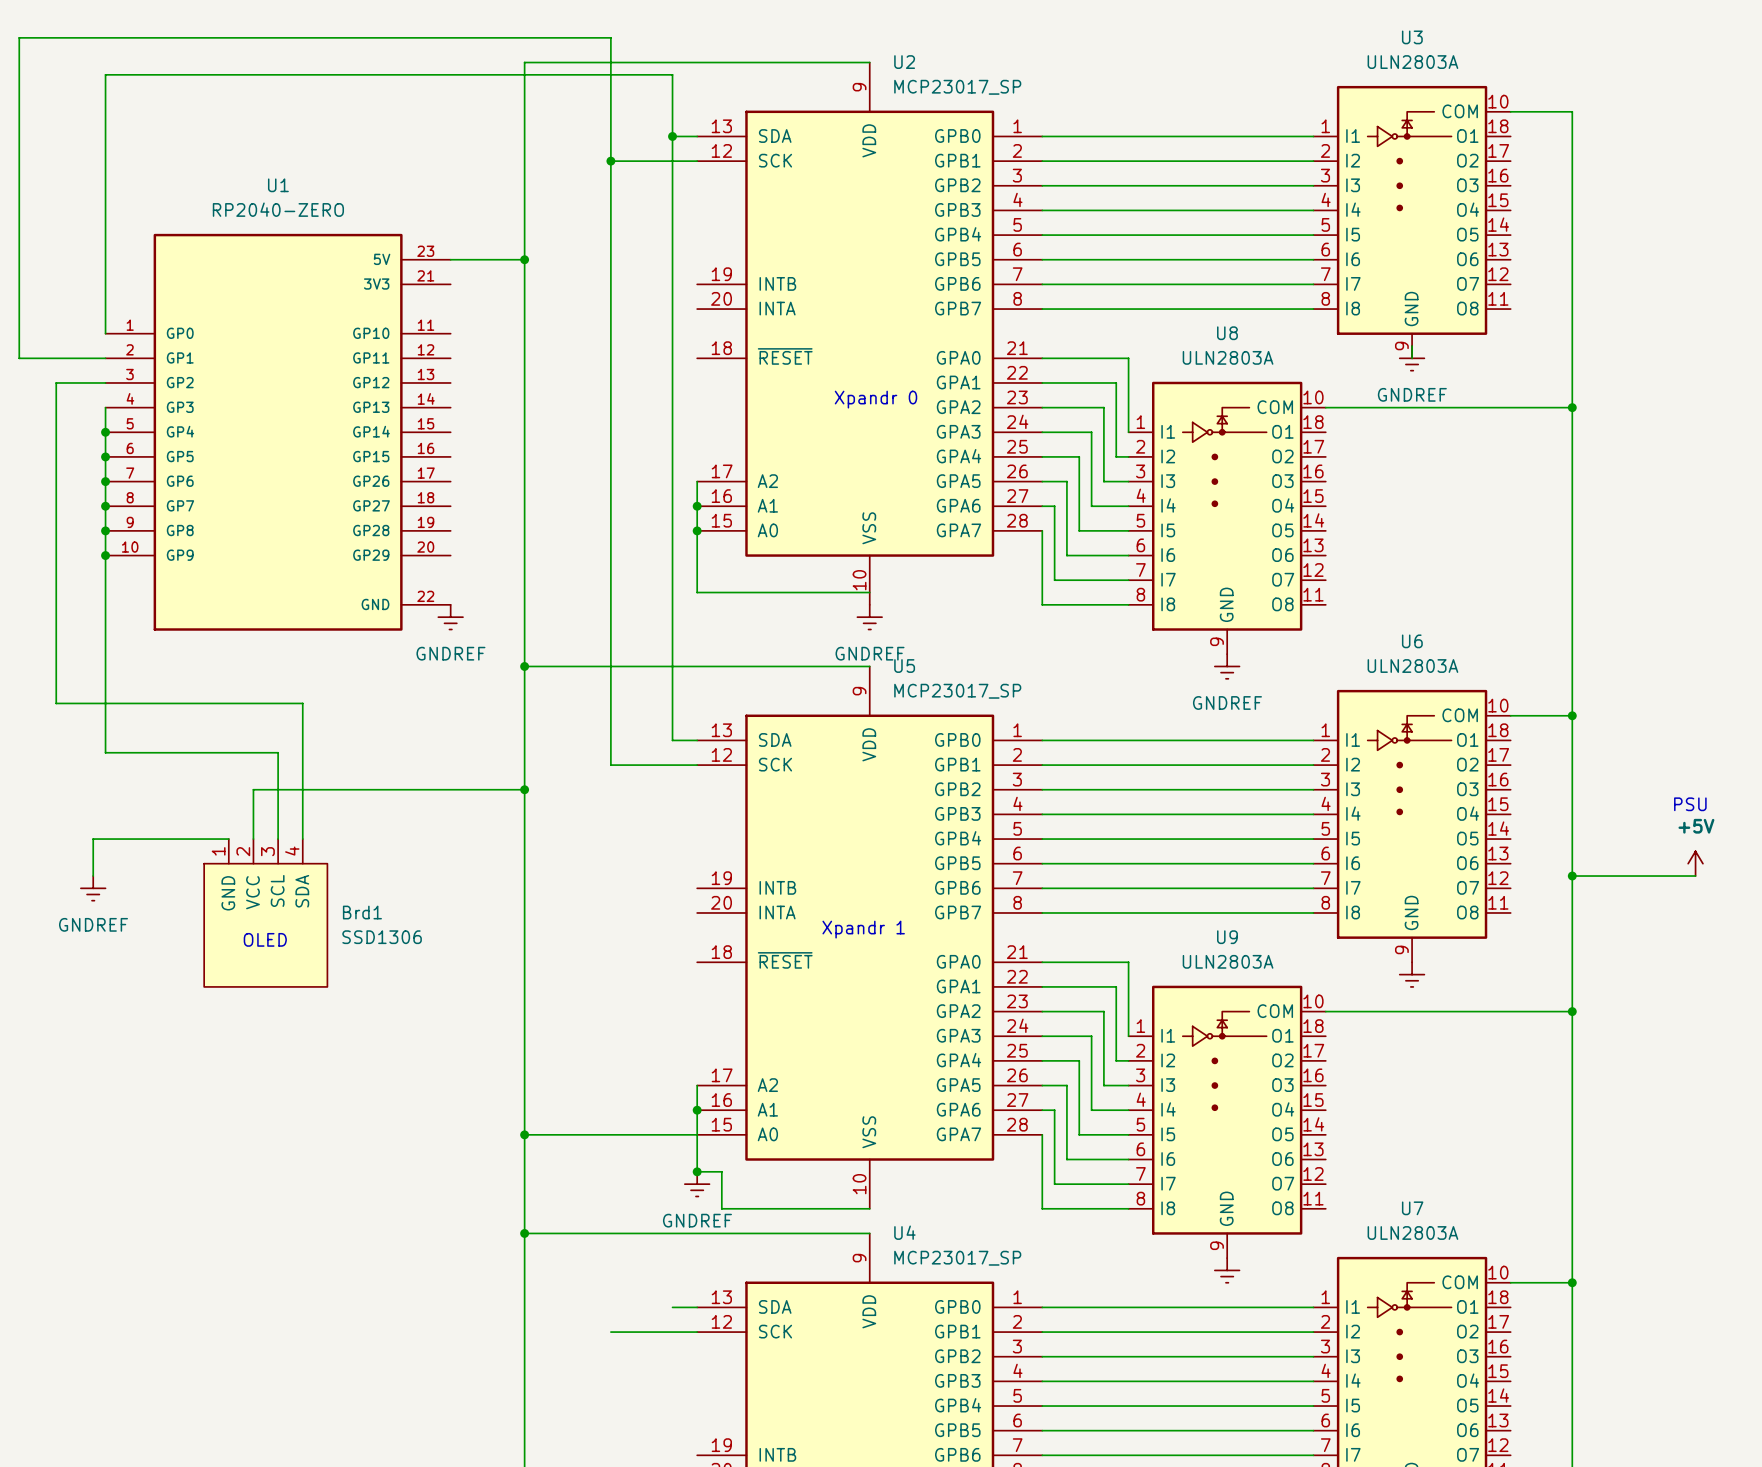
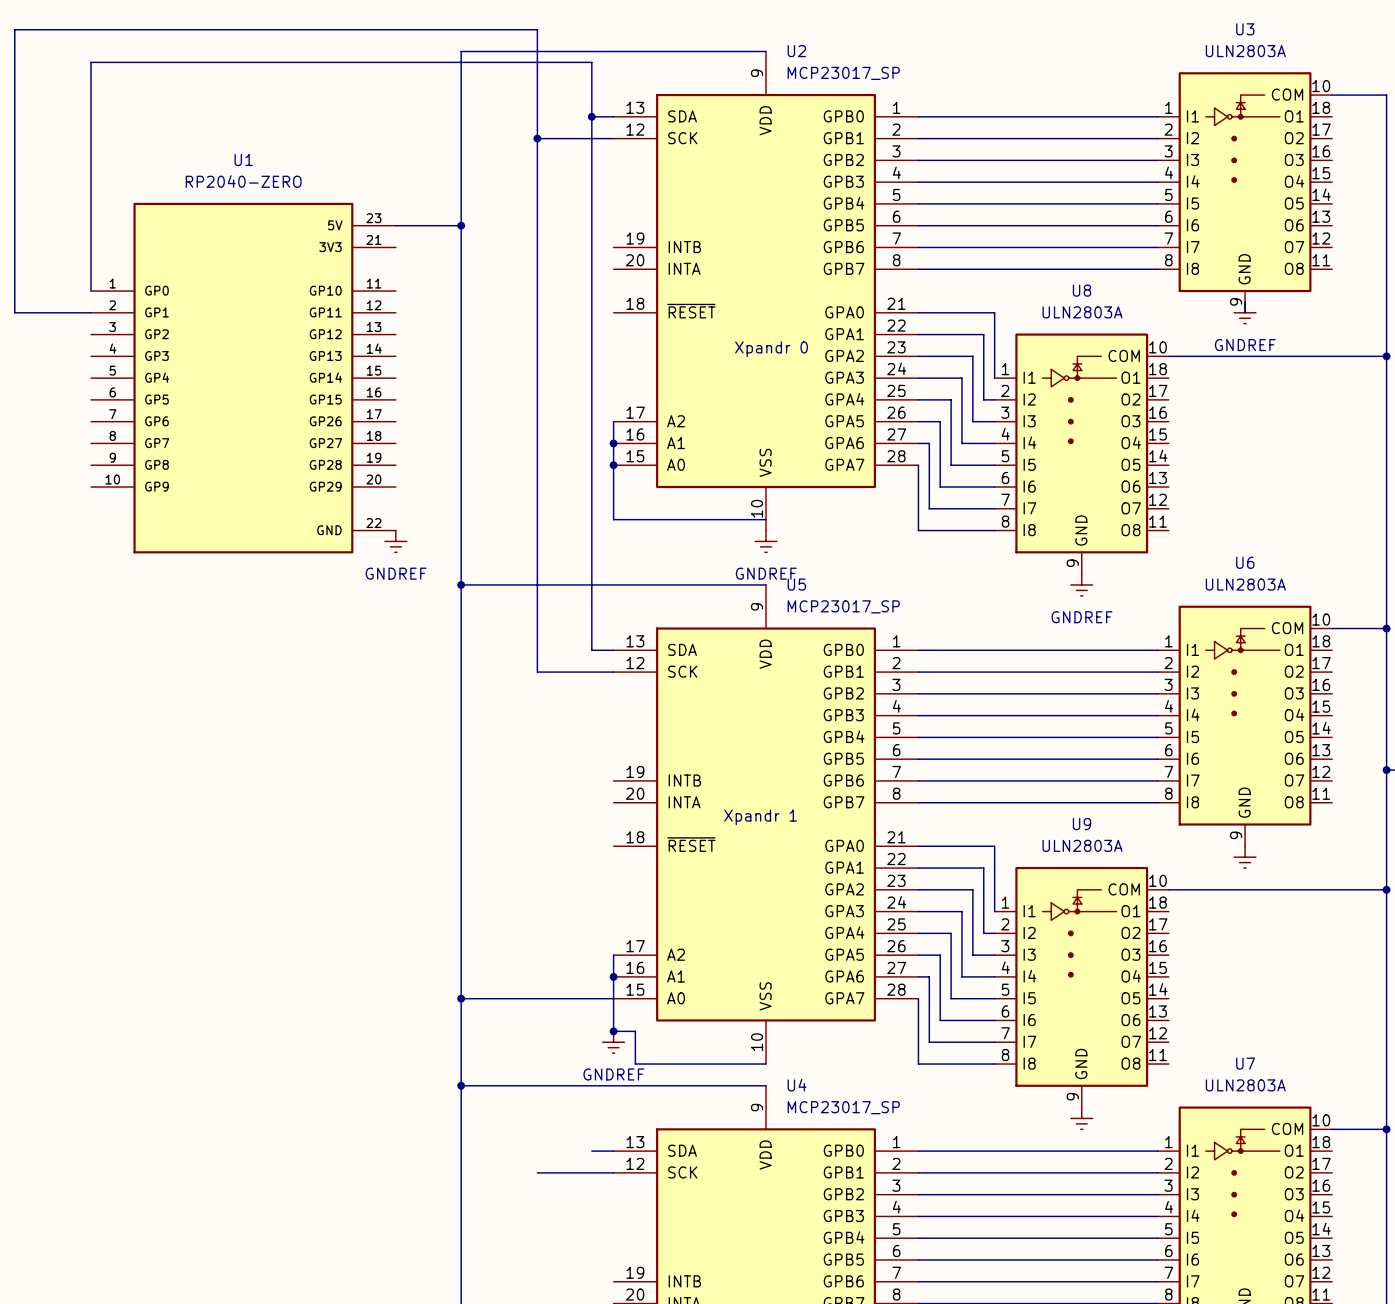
wire: (105, 382) (56, 382) (56, 703) (302, 703) (302, 839) -> none
wire: (105, 407) (105, 752) (278, 752) (278, 839) -> none
junction: (105, 432) -> none
junction: (105, 456) -> none
junction: (105, 481) -> none
junction: (105, 506) -> none
junction: (105, 530) -> none
junction: (105, 555) -> none
wire: (524, 789) (253, 789) (253, 839) -> none
junction: (524, 789) -> none
wire: (228, 839) (93, 839) (93, 876) -> none
power symbol: GNDREF (93, 888) -> none
Brd1: SSD1306 (265, 912) -> none
text: OLED (265, 939) -> none

